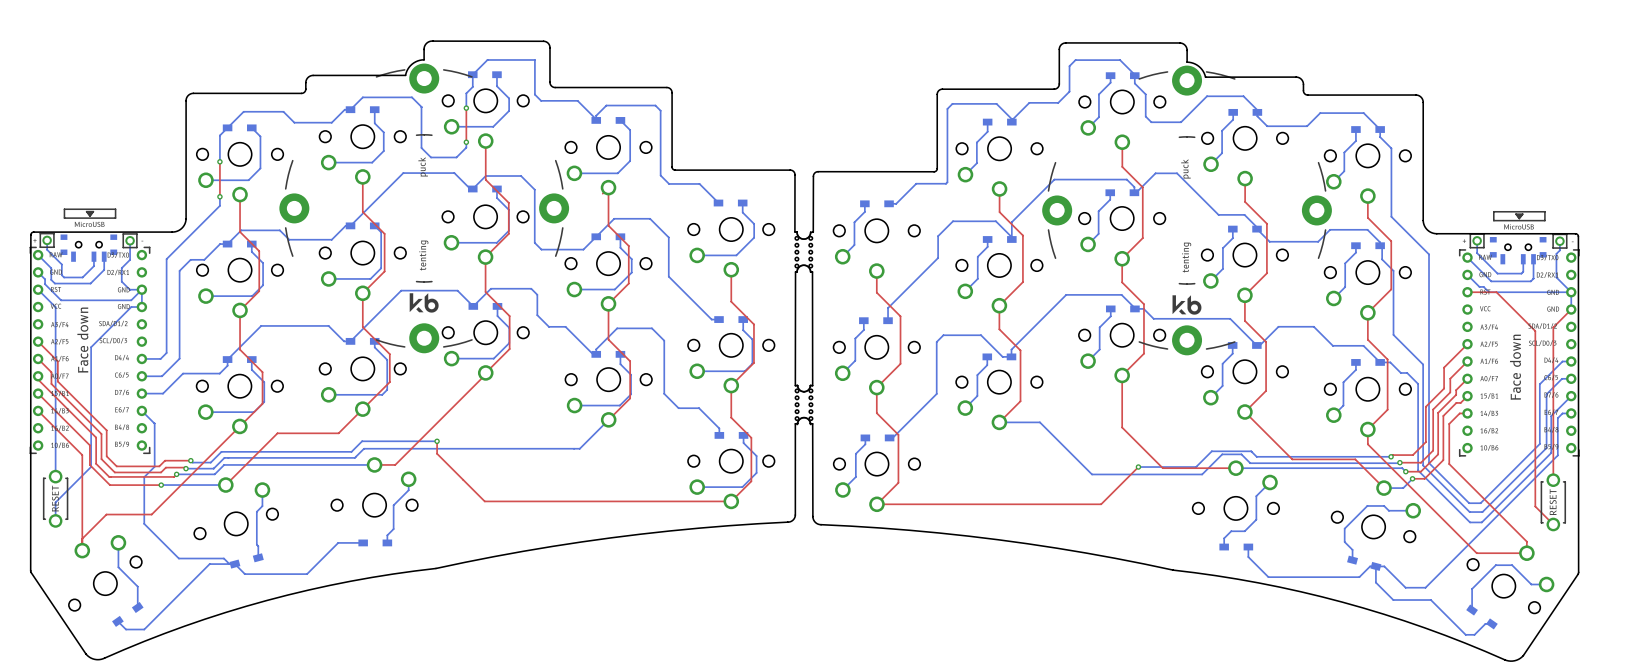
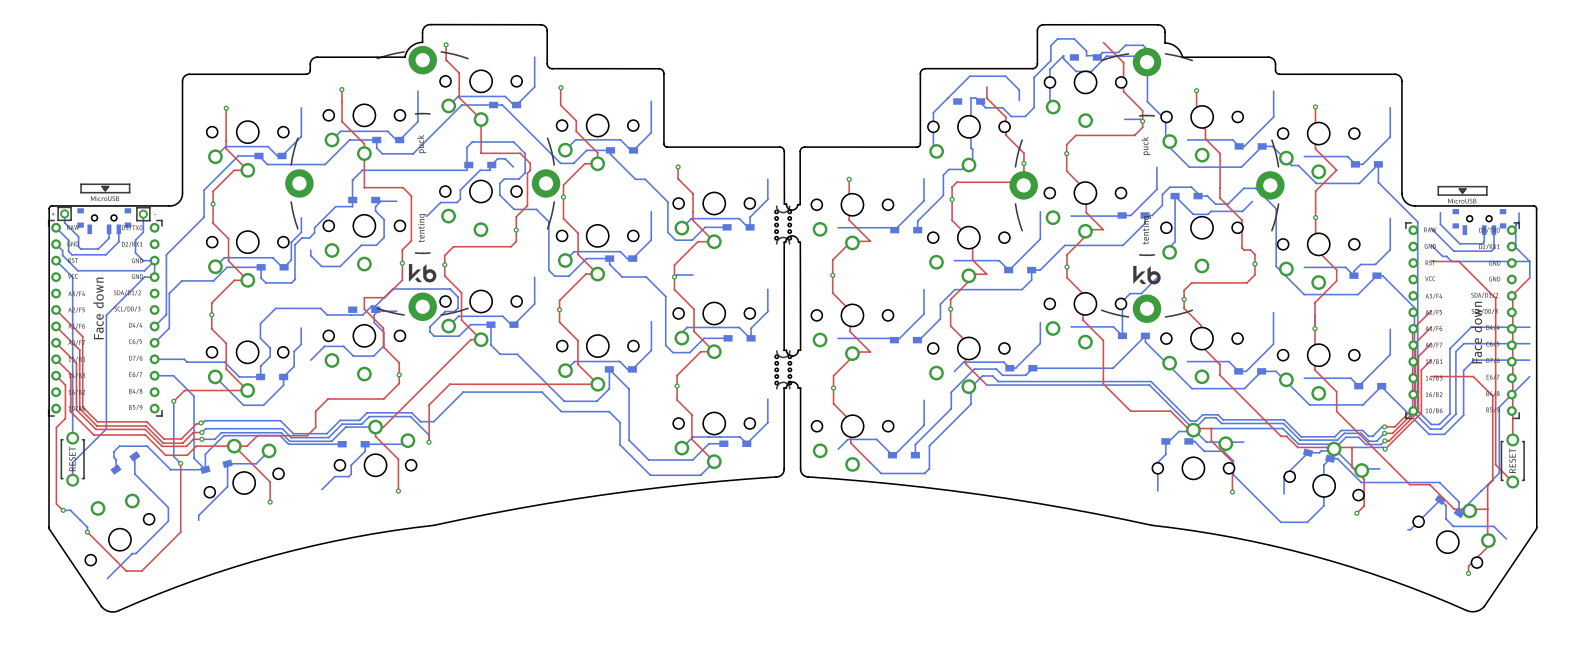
board edge: (433, 41) (546, 41) (549, 46) (550, 83) (553, 87) (669, 88) (672, 92) (672, 169) (792, 170) (794, 174) (794, 231) (802, 239) (807, 237) (810, 232) (813, 232) (813, 176) (815, 172) (935, 171) (938, 90) (1056, 88) (1059, 84) (1059, 47) (1065, 42) (1180, 43) (1186, 47) (1187, 62) (1198, 66) (1205, 77) (1297, 77) (1302, 80) (1303, 92) (1307, 95) (1418, 95) (1423, 101) (1423, 220) (1427, 229) (1436, 233) (1575, 233) (1578, 236) (1578, 573) (1523, 655) (1514, 660) (1506, 660) (1444, 635) (1383, 614) (1321, 596) (1258, 582) (998, 539) (909, 530) (817, 524) (812, 516) (812, 423) (810, 423) (808, 419) (804, 417) (795, 423) (795, 515) (790, 521) (699, 528) (610, 537) (523, 551) (435, 568) -> (431, 24) (541, 24) (547, 30) (547, 64) (550, 68) (661, 69) (663, 73) (664, 146) (781, 147) (784, 151) (784, 204) (791, 210) (800, 204) (800, 151) (801, 148) (918, 146) (920, 144) (921, 70) (1034, 68) (1037, 64) (1037, 29) (1043, 24) (1159, 24) (1164, 29) (1165, 43) (1176, 47) (1182, 57) (1269, 57) (1274, 60) (1275, 71) (1279, 74) (1397, 74) (1401, 80) (1401, 193) (1405, 202) (1414, 205) (1533, 205) (1536, 208) (1536, 528) (1484, 606) (1476, 611) (1468, 611) (1409, 587) (1351, 567) (1252, 541) (981, 494) (894, 484) (806, 476) (802, 473) (800, 469) (800, 387) (793, 382) (784, 387) (784, 470) (778, 476) (690, 484) (604, 494) (518, 508) (433, 525)
top track: none -> (1103, 42) (1123, 62) (1123, 91) (1142, 110) (1142, 127) (1134, 135) (1075, 135) (1066, 144) (1066, 171) (1086, 190) (1086, 212) (1103, 229) (1092, 229) (1067, 254) (1067, 277) (1082, 293) (1082, 320) (1103, 340) (1103, 383) (1130, 411) (1170, 411) (1188, 428) (1211, 428) (1211, 440) (1232, 461) (1232, 492)
top track: none -> (446, 44) (446, 59) (459, 73) (459, 97) (481, 119)
via: none -> (446, 44)
part: (484, 74) -> none
bottom track: (496, 74) (496, 86) (509, 98) (509, 110) (493, 126) (451, 126) -> (534, 57) (534, 86) (516, 105) (513, 105) (505, 96) (458, 96) (448, 105)
bottom track: none -> (1135, 56) (1106, 56) (1091, 71) (1076, 71) (1063, 58) (1063, 55) (1049, 69) (1049, 105)
bottom track: (1110, 75) (1110, 82) (1098, 94) (1098, 117) (1088, 127) -> none
board edge: (301, 93) (193, 93) (188, 95) (186, 100) (185, 220) (183, 227) (177, 231) (157, 232) -> (306, 74) (189, 74) (184, 76) (182, 81) (182, 194) (177, 203) (169, 205)
top track: none -> (986, 87) (986, 98) (1005, 117) (1005, 135) (1023, 153) (1023, 172) (1014, 182) (956, 182) (952, 187) (952, 220) (972, 240) (972, 260) (986, 274) (975, 274) (950, 299) (950, 325) (965, 340) (965, 363) (986, 385)
top track: none -> (561, 87) (560, 105) (576, 120) (576, 131) (597, 152) (597, 163) (584, 163) (563, 185) (563, 218) (578, 233) (578, 254) (597, 274) (585, 274) (559, 300) (559, 322) (577, 340) (577, 364) (597, 384) (449, 384) (429, 404) (428, 442)
via: none -> (561, 87)
bottom track: (466, 108) (466, 93) (472, 86) (472, 74) (487, 59) (534, 59) (534, 94) (541, 100) (577, 100) (596, 119) -> none
top track: (466, 108) (466, 142) -> none
via: (466, 108) -> none
top track: none -> (341, 89) (342, 121) (364, 143) (364, 153)
via: none -> (341, 89)
part position: (362, 109) -> (388, 140)
bottom track: (374, 109) (374, 123) (383, 132) (383, 151) (372, 162) (328, 162) -> (417, 91) (417, 121) (399, 140) (396, 140) (387, 131) (340, 131) (332, 139)
top track: none -> (1196, 90) (1196, 120) (1205, 129) (1205, 138) (1220, 153) (1219, 198) (1241, 220) (1241, 247) (1244, 250) (1250, 250) (1254, 254) (1254, 274) (1246, 282) (1191, 282) (1184, 290) (1184, 308) (1201, 325) (1201, 345) (1219, 364) (1219, 375) (1281, 436) (1286, 436) (1297, 447) (1351, 447) (1351, 467) (1364, 479) (1364, 506) (1356, 513)
via: none -> (1196, 90)
bottom track: none -> (1273, 91) (1273, 117) (1244, 146) (1239, 146) (1232, 139) (1187, 139)
bottom track: (1233, 112) (1233, 119) (1222, 130) (1222, 153) (1211, 164) -> none
part: (1245, 112) -> none
bottom track: (596, 120) (596, 115) (606, 105) (655, 105) (660, 110) (660, 175) (669, 183) (699, 183) (718, 202) -> none
part: (608, 120) -> none
bottom track: (620, 120) (630, 130) (630, 160) (617, 173) (574, 173) -> (651, 101) (651, 132) (633, 150) (631, 150) (620, 139) (575, 139) (565, 150)
bottom track: (1011, 120) (1029, 102) (1058, 102) (1069, 91) (1069, 66) (1075, 60) (1120, 60) (1134, 74) (1134, 83) (1145, 94) (1145, 116) (1151, 122) (1181, 122) (1207, 96) (1243, 96) (1257, 110) (1257, 116) (1267, 126) (1307, 126) (1320, 113) (1363, 113) (1380, 129) (1380, 137) (1391, 148) (1391, 216) (1429, 254) (1429, 463) (1469, 503) (1480, 503) (1539, 443) (1539, 384) (1562, 361) (1571, 361) -> none
bottom track: none -> (1019, 100) (1019, 90) (1005, 76) (969, 76) (933, 112) (933, 149)
bottom track: (987, 122) (987, 131) (976, 142) (976, 163) (965, 174) -> none
bottom track: (1011, 122) (1011, 119) (996, 103) (952, 103) (947, 108) (947, 182) (916, 183) (896, 203) (889, 202) -> none
part: none -> (505, 105)
part: (239, 127) -> none
bottom track: (251, 127) (260, 136) (260, 168) (248, 180) (205, 180) -> (301, 107) (301, 136) (281, 155) (277, 155) (268, 146) (225, 146) (215, 156)
top track: none -> (1315, 106) (1315, 148) (1336, 170) (1315, 191) (1315, 248) (1336, 269) (1336, 280) (1314, 302) (1314, 370) (1336, 391) (1336, 411) (1409, 484) (1429, 484) (1454, 509) (1487, 509)
via: none -> (1315, 106)
bottom track: none -> (1390, 107) (1390, 136) (1362, 164) (1355, 164) (1347, 156) (1304, 156)
bottom track: (1355, 129) (1355, 140) (1344, 152) (1344, 171) (1333, 181) -> none
part: (1368, 129) -> none
bottom track: none -> (1124, 119) (1140, 119) (1142, 121)
bottom track: (466, 142) (466, 147) (456, 157) (431, 157) (421, 147) (421, 107) (411, 97) (362, 97) (350, 109) (344, 109) (331, 122) (294, 122) (283, 111) (243, 111) (219, 135) (219, 161) -> none
via: (466, 142) -> none
top track: (1122, 142) (1122, 166) (1142, 187) (1142, 238) (1122, 258) (1122, 282) (1143, 304) (1143, 353) (1122, 375) (1122, 427) (1162, 468) (1235, 468) -> none
via: none -> (1142, 121)
top track: (219, 161) (219, 196) -> none
via position: (219, 161) -> (226, 108)
part: none -> (1250, 146)
part: none -> (622, 150)
top track: (485, 176) (485, 179) (508, 202) (508, 233) (485, 257) (485, 292) (509, 316) (509, 349) (395, 464) (382, 464) -> (481, 153) (520, 153) (530, 163) (530, 170) (527, 173) (527, 205) (516, 216) (516, 241) (511, 246) (453, 246) (444, 255) (444, 276) (461, 292) (461, 320) (481, 339) (470, 339) (383, 427)
via: none -> (1066, 153)
top track: (1245, 178) (1245, 201) (1266, 223) (1266, 273) (1244, 295) (1244, 320) (1266, 342) (1266, 390) (1244, 412) (1292, 459) (1355, 459) (1384, 488) -> none
part: none -> (270, 155)
top track: (608, 187) (608, 225) (628, 245) (628, 283) (608, 303) (608, 339) (630, 361) (630, 398) (608, 419) -> none
via: none -> (1023, 163)
bottom track: (496, 188) (496, 197) (508, 209) (508, 230) (496, 242) (451, 242) -> none
top track: (999, 188) (999, 212) (1022, 235) (1022, 282) (999, 305) (999, 329) (1020, 350) (1020, 401) (999, 422) -> none
part: none -> (1366, 164)
bottom track: none -> (513, 166) (505, 158) (497, 158) (489, 166) (489, 170) (480, 170) (460, 190) (460, 199) (457, 202) (440, 202) (427, 215)
top track: none -> (678, 167) (678, 178) (693, 193) (693, 220) (714, 241) (697, 241) (674, 265) (674, 289) (694, 309) (694, 331) (714, 351) (700, 351) (677, 375) (677, 399) (691, 414) (691, 439) (714, 461)
via: none -> (678, 167)
bottom track: none -> (1156, 167) (1156, 189) (1130, 215) (1071, 216)
bottom track: (1110, 192) (1110, 199) (1098, 211) (1098, 233) (1088, 244) -> none
part: (1122, 192) -> none
top track: (240, 194) (240, 231) (259, 251) (259, 291) (240, 310) (240, 349) (262, 372) (262, 403) (239, 426) -> (226, 108) (226, 148) (247, 170) (234, 170) (213, 191) (213, 223) (228, 238) (228, 261) (247, 280) (234, 280) (211, 302) (211, 328) (226, 343) (226, 369) (247, 390)
bottom track: (219, 196) (219, 205) (166, 259) (166, 352) (160, 358) (141, 358) -> (727, 227) (705, 227) (692, 240) (675, 240) (667, 232) (667, 202) (645, 179) (635, 179) (610, 154) (610, 150) (586, 150) (573, 163) (560, 163) (502, 105) (461, 105) (413, 153) (382, 153) (376, 148) (376, 140) (349, 140) (325, 164) (267, 164) (258, 155) (238, 155) (204, 190) (204, 217) (166, 254) (166, 314) (154, 326)
via: (219, 196) -> none
top track: (1367, 196) (1367, 217) (1391, 241) (1391, 289) (1367, 312) (1367, 339) (1387, 359) (1387, 409) (1367, 429) (1367, 444) (1476, 553) (1526, 553) (1526, 541) (1449, 464) (1449, 423) (1459, 413) (1467, 413) -> none
part: (730, 203) -> none
bottom track: (742, 203) (742, 212) (754, 223) (754, 237) (736, 255) (697, 255) -> (767, 179) (767, 199) (750, 217) (750, 227) (739, 218) (691, 218) (681, 228)
bottom track: (864, 203) (864, 211) (854, 222) (854, 244) (842, 256) -> none
part: (876, 203) -> none
bottom track: none -> (923, 178) (923, 200) (894, 230) (892, 227) (838, 227)
top track: none -> (849, 179) (849, 220) (870, 241) (851, 241) (832, 260) (832, 293) (850, 310) (850, 331) (870, 352) (857, 352) (833, 375) (833, 403) (850, 421) (850, 443) (870, 462)
via: none -> (849, 179)
top track: (362, 212) (384, 233) (384, 271) (362, 293) (362, 327) (389, 354) (389, 382) (338, 433) (277, 433) (225, 485) -> (364, 186) (402, 187) (411, 196) (411, 240) (402, 249) (402, 280) (384, 297) (364, 297) (364, 309) (383, 328) (383, 347) (399, 362) (399, 383) (383, 399) (328, 399) (315, 411) (315, 427) (307, 435) (257, 435) (247, 446) (196, 446) (187, 455) (165, 455) (145, 435) (93, 435) (70, 411) (70, 374)
via: none -> (563, 197)
bottom track: (374, 225) (381, 232) (381, 268) (370, 278) (328, 278) -> none
via: none -> (952, 199)
bottom track: none -> (396, 201) (380, 201) (375, 206) (375, 211) (384, 219) (384, 237) (376, 245) (361, 245) (340, 266) (321, 266) (310, 255) (310, 250)
bottom track: none -> (1252, 201) (1242, 211) (1211, 211) (1208, 214) (1193, 214) (1175, 196) (1175, 241) (1166, 250)
bottom track: (1232, 229) (1232, 238) (1222, 248) (1222, 268) (1210, 280) -> none
part position: (1244, 229) -> (1186, 196)
via: none -> (213, 204)
part: (608, 236) -> none
bottom track: (620, 236) (620, 247) (631, 259) (631, 272) (614, 289) (574, 289) -> (651, 211) (651, 240) (632, 258) (627, 258) (620, 251) (574, 251) (565, 260)
bottom track: (1011, 237) (995, 221) (952, 221) (938, 236) (938, 258) (888, 308) (888, 320) -> none
bottom track: none -> (1040, 211) (1040, 239) (1009, 270) (999, 260) (954, 260)
bottom track: (987, 239) (987, 246) (977, 256) (977, 278) (965, 291) -> none
part: (999, 239) -> none
bottom track: (1011, 239) (1011, 222) (1054, 179) (1126, 179) (1134, 187) (1134, 192) (1136, 192) (1155, 173) (1177, 173) (1218, 214) (1244, 214) (1269, 241) (1318, 241) (1330, 229) (1367, 229) (1380, 242) (1382, 259) (1393, 270) (1393, 334) (1423, 364) (1423, 465) (1469, 512) (1482, 512) (1546, 447) (1546, 394) (1562, 378) (1571, 378) -> none
bottom track: (1477, 240) (1477, 253) (1497, 273) (1521, 273) (1523, 271) (1523, 259) -> (1440, 212) (1440, 224) (1459, 243) (1482, 243) (1484, 230)
part: (1477, 240) -> none
bottom track: (1559, 241) (1559, 250) (1556, 253) (1556, 277) (1571, 292) -> (1519, 213) (1519, 221) (1515, 225) (1515, 247) (1529, 261)
part: (1559, 241) -> none
part: none -> (1133, 215)
part: (239, 244) -> none
bottom track: (251, 244) (251, 251) (263, 263) (263, 285) (252, 296) (205, 296) -> (301, 217) (301, 232) (291, 242) (291, 260) (284, 267) (272, 257) (224, 257) (215, 266)
via: none -> (1315, 217)
bottom track: (1355, 245) (1355, 252) (1345, 263) (1345, 287) (1333, 298) -> none
part: (1368, 245) -> none
bottom track: none -> (1390, 218) (1390, 249) (1375, 264) (1360, 264) (1353, 271) (1353, 275) (1345, 267) (1304, 267)
part position: (1518, 250) -> (1479, 222)
part: none -> (738, 227)
via: none -> (516, 229)
part: none -> (906, 230)
bottom track: none -> (917, 230) (917, 221) (943, 195) (943, 175) (948, 169) (962, 169) (972, 159) (970, 98) (975, 98) (985, 107) (1002, 107) (1011, 116) (1025, 116) (1034, 107) (1034, 77) (1050, 60) (1050, 45) (1057, 38) (1074, 38) (1086, 51) (1086, 55) (1099, 55) (1102, 52) (1118, 52) (1125, 45) (1142, 45) (1147, 49) (1147, 101) (1165, 119) (1165, 143) (1189, 167) (1241, 167) (1262, 146) (1272, 146) (1291, 165) (1298, 165) (1316, 183) (1359, 183) (1378, 164) (1378, 182) (1417, 221) (1417, 410) (1431, 424) (1439, 424) (1449, 413) (1449, 348) (1471, 327) (1529, 327)
bottom track: (1467, 257) (1491, 281) (1530, 281) (1533, 278) -> (1431, 228) (1453, 251) (1491, 251) (1494, 248)
bottom track: (1533, 259) (1533, 278) -> (1493, 230) (1493, 248)
top track: (731, 269) (731, 301) (753, 324) (753, 362) (731, 385) (731, 417) (751, 437) (751, 481) (731, 501) (484, 501) (437, 453) (437, 441) -> none
board edge: none -> (784, 242) (792, 235) (800, 242) (800, 350) (793, 356) (784, 350) (784, 242)
board edge: (795, 271) (799, 266) (803, 265) (812, 271) (812, 385) (804, 391) (795, 385) (795, 271) -> none
top track: (876, 271) (876, 292) (900, 316) (900, 363) (876, 387) (876, 413) (898, 434) (898, 482) (876, 504) (1101, 504) (1138, 467) -> none
bottom track: (1467, 274) (1479, 286) (1483, 286) (1489, 292) (1571, 292) -> (1431, 245) (1442, 256) (1446, 256) (1451, 261) (1529, 261)
part: none -> (621, 258)
via: none -> (402, 263)
top track: (1467, 292) (1496, 292) (1535, 331) (1535, 506) (1553, 524) -> (1431, 261) (1458, 261) (1495, 298) (1495, 464) (1512, 482)
bottom track: (1571, 292) (1571, 309) -> (1529, 261) (1529, 277)
via: none -> (1254, 263)
via: none -> (444, 264)
part: none -> (272, 267)
via: none -> (1067, 266)
part: none -> (1020, 270)
bottom track: none -> (693, 274) (676, 274) (674, 277)
via: none -> (832, 275)
part: none -> (1365, 275)
part: (485, 306) -> none
bottom track: (497, 306) (497, 316) (509, 327) (509, 343) (493, 358) (451, 358) -> (534, 277) (534, 303) (513, 324) (511, 324) (502, 316) (458, 316) (448, 326)
via: none -> (674, 277)
bottom track: (1110, 308) (1110, 316) (1099, 327) (1099, 349) (1088, 361) -> none
part: (1122, 308) -> none
bottom track: none -> (1156, 278) (1141, 293) (1130, 293) (1122, 301) (1122, 335) (1113, 326) (1071, 326)
top track: (1571, 309) (1553, 327) (1553, 480) -> (1529, 277) (1512, 294) (1512, 439)
bottom track: (719, 319) (711, 319) (668, 276) (668, 237) (650, 218) (614, 218) (583, 249) (541, 249) (534, 242) (534, 189) (521, 176) (485, 176) (472, 188) (470, 188) (454, 173) (403, 173) (350, 225) (345, 225) (331, 239) (289, 239) (279, 230) (241, 230) (227, 244) (220, 244) (204, 259) (190, 259) (179, 270) (179, 358) (162, 376) (141, 376) -> (728, 338) (704, 338) (689, 352) (672, 352) (665, 345) (665, 296) (646, 277) (622, 277) (609, 264) (609, 258) (586, 258) (568, 276) (554, 276) (548, 270) (548, 221) (536, 209) (514, 209) (499, 195) (499, 183) (504, 179) (519, 179) (525, 172) (525, 153) (513, 142) (472, 142) (466, 147) (466, 170) (362, 170) (352, 180) (352, 206) (335, 206) (314, 227) (314, 232) (309, 238) (301, 238) (294, 244) (294, 279) (291, 282) (265, 282) (261, 278) (261, 267) (227, 267) (213, 280) (181, 280) (169, 293) (169, 328) (154, 342)
part: (731, 319) -> none
bottom track: (743, 319) (743, 330) (752, 339) (752, 363) (744, 371) -> none
bottom track: (863, 320) (863, 330) (855, 338) (855, 360) (842, 373) -> none
part: (875, 320) -> none
bottom track: none -> (923, 289) (923, 314) (897, 340) (892, 338) (838, 338)
via: none -> (1184, 299)
via: none -> (950, 309)
bottom track: (374, 341) (374, 347) (387, 359) (387, 389) (382, 394) (328, 394) -> none
via: none -> (559, 309)
top track: none -> (1431, 310) (1412, 329) (1412, 409) (1394, 426) (1384, 426)
bottom track: none -> (396, 311) (377, 311) (374, 314) (374, 322) (383, 332) (383, 345) (373, 356) (353, 356) (343, 346) (324, 346) (310, 360)
bottom track: none -> (1273, 312) (1273, 344) (1246, 371) (1238, 371) (1228, 361) (1187, 361)
top track: (1467, 344) (1444, 367) (1444, 388) (1425, 406) (1425, 442) (1412, 455) (1392, 455) (1391, 456) -> none
bottom track: (1232, 345) (1232, 353) (1222, 363) (1222, 385) (1210, 397) -> none
part: (1244, 345) -> none
via: none -> (211, 314)
part: (608, 354) -> none
bottom track: (620, 354) (620, 364) (631, 374) (631, 394) (619, 405) (574, 405) -> (651, 321) (651, 350) (632, 369) (627, 369) (619, 361) (574, 361) (565, 370)
bottom track: none -> (1040, 322) (1040, 343) (1015, 368) (1009, 368) (1003, 362) (963, 362) (954, 371)
bottom track: (987, 356) (987, 365) (977, 375) (977, 395) (965, 408) -> none
part: (999, 356) -> none
part: none -> (502, 324)
part: (239, 359) -> none
bottom track: (251, 359) (251, 369) (264, 382) (264, 401) (254, 412) (205, 412) -> (301, 328) (301, 344) (294, 351) (294, 366) (283, 376) (283, 385) (263, 405) (243, 405) (215, 376)
top track: none -> (1431, 327) (1415, 342) (1415, 410) (1392, 433) (1384, 433)
top track: (57, 361) (57, 381) (106, 430) (106, 456) (116, 466) (159, 466) (165, 460) (190, 460) -> (74, 328) (82, 336) (82, 407) (97, 421) (146, 421) (163, 438) (181, 438) (196, 423) (201, 423)
via: none -> (1314, 328)
top track: (1467, 361) (1450, 378) (1450, 392) (1433, 409) (1433, 450) (1421, 462) (1399, 462) -> none
bottom track: (1355, 362) (1355, 369) (1343, 382) (1343, 405) (1333, 415) -> none
part: (1368, 362) -> none
bottom track: none -> (1390, 329) (1390, 354) (1358, 386) (1350, 378) (1304, 378)
text position: Face down (1515, 367) -> Face down (1476, 332)
part: none -> (1133, 335)
bottom track: (697, 371) (744, 371) -> (681, 338) (681, 332) (687, 327) (739, 327) (751, 338) (751, 328) (767, 311) (767, 289)
part: none -> (739, 338)
top track: (51, 372) (51, 383) (101, 434) (101, 459) (114, 472) (161, 472) (165, 467) (186, 468) -> (68, 339) (79, 350) (79, 408) (97, 425) (146, 425) (163, 443) (182, 443) (193, 432) (201, 432)
part: none -> (905, 340)
bottom track: none -> (917, 340) (940, 318) (940, 304) (954, 289) (1021, 289) (1031, 279) (1031, 270) (1040, 270) (1064, 245) (1122, 245) (1145, 223) (1145, 215) (1152, 215) (1162, 205) (1162, 194) (1169, 187) (1191, 187) (1198, 196) (1207, 196) (1215, 204) (1228, 204) (1243, 188) (1255, 188) (1276, 208) (1276, 266) (1304, 294) (1358, 294) (1376, 275) (1382, 275) (1414, 307) (1414, 413) (1430, 429) (1440, 429) (1455, 414) (1455, 351) (1463, 343) (1529, 343)
top track: (38, 376) (38, 379) (96, 437) (96, 463) (109, 476) (174, 476) (176, 474) -> (56, 342) (76, 363) (76, 409) (96, 429) (145, 429) (162, 446) (186, 446) (193, 439) (201, 439)
top track: none -> (1431, 343) (1418, 356) (1418, 411) (1389, 440) (1384, 440)
top track: (1467, 378) (1456, 390) (1456, 394) (1438, 412) (1438, 454) (1420, 471) (1405, 471) -> none
bottom track: (163, 393) (183, 373) (219, 373) (227, 365) (227, 359) (261, 325) (328, 325) (344, 341) (350, 341) (401, 290) (457, 290) (473, 306) (490, 288) (531, 288) (537, 294) (537, 315) (548, 326) (565, 326) (593, 354) (596, 354) (596, 349) (617, 328) (651, 328) (664, 340) (664, 393) (678, 408) (699, 408) (719, 428) (719, 435) -> (174, 359) (184, 359) (187, 362) (224, 362) (239, 376) (260, 376) (260, 366) (270, 356) (270, 348) (260, 338) (260, 323) (275, 308) (320, 308) (327, 314) (362, 314) (371, 306) (375, 306) (392, 289) (450, 289) (458, 297) (458, 308) (454, 311) (445, 311) (429, 326) (429, 331) (434, 336) (459, 336) (470, 324) (490, 324) (490, 345) (500, 354) (517, 354) (564, 401) (596, 401) (609, 388) (609, 369) (629, 389) (629, 440) (648, 460) (692, 460) (708, 443) (723, 443)
top track: none -> (1431, 360) (1421, 370) (1421, 412) (1385, 449)
bottom track: none -> (1529, 360) (1474, 360) (1463, 370) (1463, 415) (1444, 434) (1429, 434) (1381, 386) (1362, 404) (1309, 404) (1276, 371) (1261, 371) (1244, 388) (1191, 388) (1145, 342) (1145, 335) (1113, 368) (1032, 368) (1025, 375) (1002, 375) (996, 369) (974, 369) (951, 392) (951, 408) (915, 444) (915, 455)
top track: (1467, 396) (1460, 402) (1456, 402) (1443, 415) (1443, 460) (1424, 478) (1412, 478) -> none
bottom track: (1571, 396) (1551, 416) (1551, 452) (1481, 522) (1470, 522) (1418, 470) (1418, 383) (1407, 372) (1400, 372) (1390, 362) (1380, 362) (1363, 345) (1332, 345) (1313, 326) (1278, 326) (1259, 345) (1256, 345) (1230, 318) (1153, 318) (1143, 308) (1134, 308) (1121, 294) (1066, 294) (1011, 349) (1011, 356) (1002, 356) (981, 335) (943, 335) (936, 342) (936, 393) (892, 437) (889, 437) -> none
part: none -> (1021, 368)
part: none -> (620, 369)
part: none -> (1250, 371)
top track: (53, 409) (89, 445) (89, 465) (109, 485) (161, 485) -> none
via: none -> (399, 374)
bottom track: (141, 410) (154, 423) (154, 466) (144, 477) (144, 523) (178, 558) (223, 558) (229, 564) -> (154, 375) (173, 375) (194, 396) (194, 458) (205, 469)
top track: none -> (1431, 376) (1473, 376) (1492, 396) (1492, 480) (1487, 485) (1487, 547) (1468, 566) (1468, 573)
bottom track: none -> (1529, 376) (1499, 407) (1499, 473) (1459, 513) (1459, 501) (1439, 482) (1361, 482) (1337, 458) (1330, 458) (1323, 465) (1323, 505) (1307, 522) (1280, 522) (1233, 474) (1233, 460) (1223, 451) (1204, 451) (1194, 441) (1188, 441)
part: none -> (272, 376)
bottom track: (1571, 413) (1562, 413) (1557, 418) (1557, 455) (1425, 587) (1405, 587) (1384, 566) (1370, 566) (1359, 577) (1268, 577) (1248, 557) (1248, 547) -> none
bottom track: (608, 419) (579, 448) -> (714, 461) (700, 475) (650, 475) (620, 444) (620, 422) (609, 411) (570, 411)
top track: (47, 420) (82, 455) (82, 550) -> (65, 385) (65, 418) (56, 427) (56, 503) (63, 510)
bottom track: none -> (986, 385) (1149, 385) (1189, 424) (1198, 424) (1205, 417) (1215, 417) (1221, 423) (1283, 423) (1300, 440) (1337, 440) (1344, 433) (1361, 433) (1369, 441) (1376, 441) (1384, 433)
via: none -> (677, 386)
part: none -> (1370, 386)
bottom track: (999, 422) (1039, 422) (1092, 474) (1202, 474) (1222, 454) (1241, 454) (1250, 463) (1399, 462) -> none
via: none -> (833, 388)
top track: (239, 426) (151, 514) (106, 514) (82, 538) -> (247, 390) (184, 390) (173, 401)
part: (731, 435) -> none
bottom track: (743, 435) (743, 443) (756, 456) (756, 472) (742, 487) (697, 487) -> (708, 436) (693, 436) (681, 448)
bottom track: none -> (767, 399) (767, 422) (746, 443) (740, 436) (719, 436)
bottom track: none -> (924, 400) (924, 425) (894, 455) (876, 439) (847, 439) (838, 449)
bottom track: none -> (173, 401) (173, 456) (180, 463)
via: none -> (173, 401)
bottom track: (865, 437) (865, 444) (855, 453) (855, 477) (842, 489) -> none
part: (877, 437) -> none
bottom track: (437, 441) (362, 441) (351, 451) (221, 451) (210, 462) (192, 462) (190, 460) -> none
via: (437, 441) -> none
bottom track: (570, 448) (364, 448) (354, 457) -> (561, 411) (541, 392) (463, 392) (433, 421) (420, 421) (411, 412) (367, 412) (359, 420) (356, 420)
bottom track: (1391, 456) (1256, 456) (1251, 451) (1211, 451) (1196, 467) (1138, 467) -> none
via: (1391, 456) -> none
bottom track: (337, 457) (224, 457) (213, 468) (186, 468) -> (340, 420) (326, 433) (293, 433) (280, 420) (205, 420) (201, 423)
via: (1399, 462) -> none
bottom track: (343, 464) (224, 464) (214, 474) (176, 474) -> (345, 427) (331, 441) (289, 441) (281, 432) (221, 432) (214, 439) (201, 439)
top track: none -> (375, 427) (375, 436) (398, 459) (398, 491)
bottom track: none -> (1384, 426) (1382, 426) (1372, 436) (1368, 436) (1362, 430) (1341, 430) (1334, 436) (1301, 436) (1284, 419) (1223, 419) (1218, 414) (1202, 414) (1196, 421) (1190, 421) (1151, 381) (998, 381) (992, 375) (982, 375) (971, 387) (971, 404) (929, 445) (929, 468) (924, 473) (881, 473) (870, 462)
via: none -> (1384, 426)
bottom track: none -> (1211, 428) (1282, 428) (1298, 444) (1338, 444) (1345, 437) (1358, 437) (1365, 444) (1381, 444) (1384, 440)
via: (1138, 467) -> none
via: (186, 468) -> none
bottom track: (1235, 468) (1402, 468) (1405, 471) -> none
bottom track: none -> (201, 432) (205, 428) (282, 428) (291, 437) (328, 437) (342, 424) (361, 424) (369, 416) (410, 416) (428, 435) (428, 442)
via: none -> (201, 432)
via: (1405, 471) -> none
via: none -> (1384, 433)
via: (176, 474) -> none
bottom track: none -> (708, 437) (719, 437)
via: none -> (201, 439)
bottom track: (1412, 478) (1403, 488) (1384, 488) -> none
via: (1412, 478) -> none
bottom track: (408, 479) (408, 490) (393, 505) (393, 529) (387, 535) (387, 542) -> (407, 440) (404, 444) (365, 444) (365, 451) (351, 465) (351, 474) (348, 476) (334, 476) (321, 489)
via: none -> (1384, 440)
via: none -> (428, 442)
part: none -> (1177, 441)
bottom track: none -> (1243, 442) (1206, 442) (1195, 431) (1179, 431) (1169, 441) (1165, 441) (1165, 454) (1157, 462) (1157, 491)
part: none -> (735, 443)
bottom track: (1270, 482) (1256, 496) (1256, 519) (1244, 531) (1231, 531) (1224, 538) (1224, 547) -> none
bottom track: none -> (342, 444) (288, 444) (280, 435) (223, 435) (205, 454) (205, 469)
bottom track: (161, 485) (225, 485) -> none
via: (161, 485) -> none
top track: none -> (234, 446) (270, 481) (270, 502)
bottom track: none -> (1351, 447) (1383, 447) (1385, 449)
via: none -> (1385, 449)
bottom track: (262, 490) (262, 506) (256, 511) (258, 557) -> (269, 450) (256, 463) (227, 463) (227, 486) (198, 515) (198, 520)
part: none -> (903, 455)
bottom track: none -> (134, 456) (134, 474) (168, 507) (168, 521) (107, 578)
part position: (1553, 502) -> (1512, 460)
top track: none -> (180, 463) (180, 532) (141, 571) (126, 571) (87, 532)
via: none -> (180, 463)
bottom track: none -> (116, 469) (113, 451) (119, 446) (147, 446) (170, 469) (205, 469)
bottom track: none -> (1379, 468) (1354, 468) (1336, 450) (1308, 452) (1284, 476) (1284, 493)
bottom track: (1413, 510) (1388, 510) (1384, 505) (1367, 505) (1344, 528) (1344, 542) (1352, 549) (1352, 560) -> none
via: none -> (398, 491)
via: none -> (1232, 492)
bottom track: (118, 542) (118, 567) (137, 586) (137, 607) -> none
bottom track: (363, 542) (338, 542) (307, 574) (244, 574) (234, 564) (209, 564) (144, 629) (126, 629) (117, 621) -> none
part position: (375, 542) -> (353, 444)
via: none -> (270, 502)
part: (1236, 547) -> none
bottom track: none -> (63, 510) (70, 510) (87, 527) (87, 532)
via: none -> (63, 510)
via: none -> (1356, 513)
part position: (246, 560) -> (216, 466)
part position: (1364, 563) -> (1319, 455)
bottom track: (1375, 566) (1375, 582) (1393, 600) (1430, 600) (1465, 634) (1474, 634) (1485, 623) (1491, 623) -> none
bottom track: none -> (1407, 529) (1410, 529) (1440, 499) (1446, 505) (1446, 519) (1453, 526) (1493, 526) (1506, 538)
via: none -> (87, 532)
bottom track: (1546, 584) (1531, 584) (1512, 565) (1495, 565) (1472, 588) (1472, 610) -> none
part position: (127, 614) -> (125, 462)
part position: (1481, 616) -> (1449, 506)
via: none -> (1468, 573)

